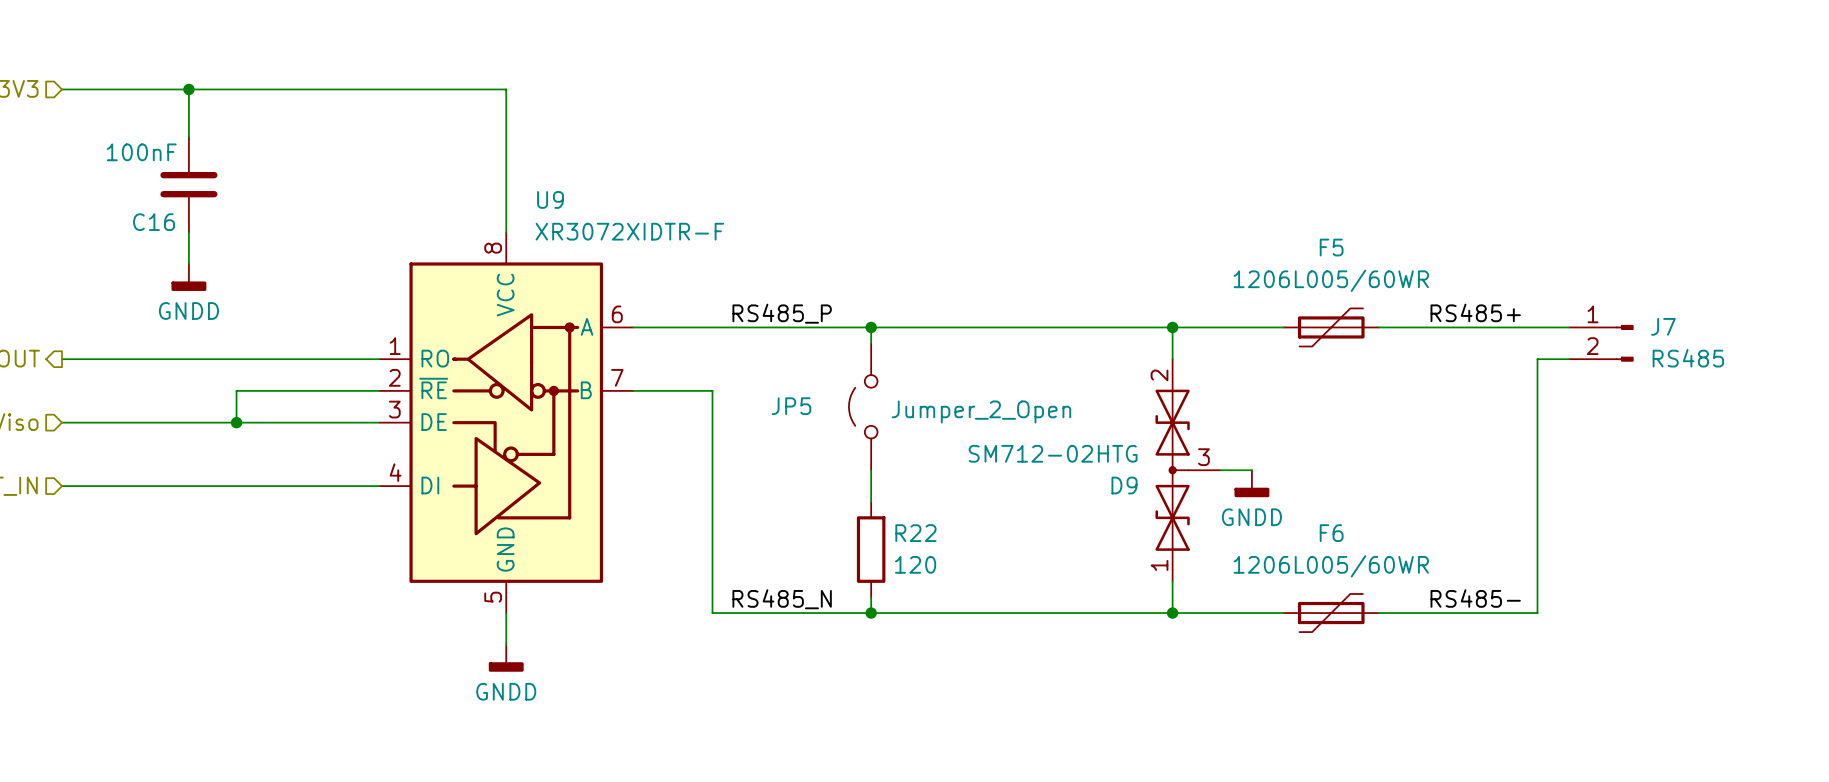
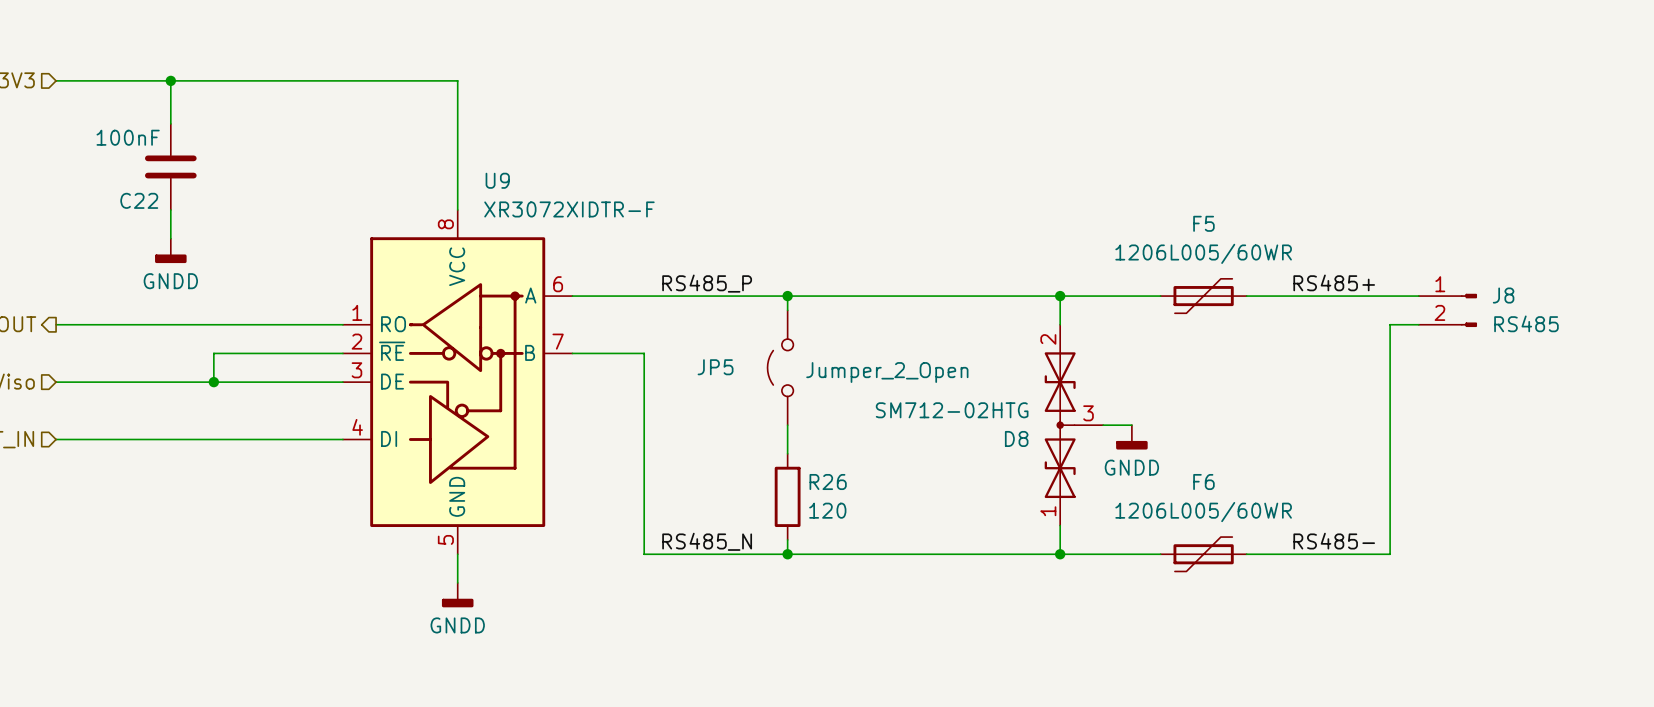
C16 name: C16 (154, 222) -> C22 (139, 200)
J7 name: J7 (1663, 326) -> J8 (1503, 295)
D9 name: D9 (1124, 485) -> D8 (1016, 438)
R22 name: R22 (915, 533) -> R26 (828, 482)

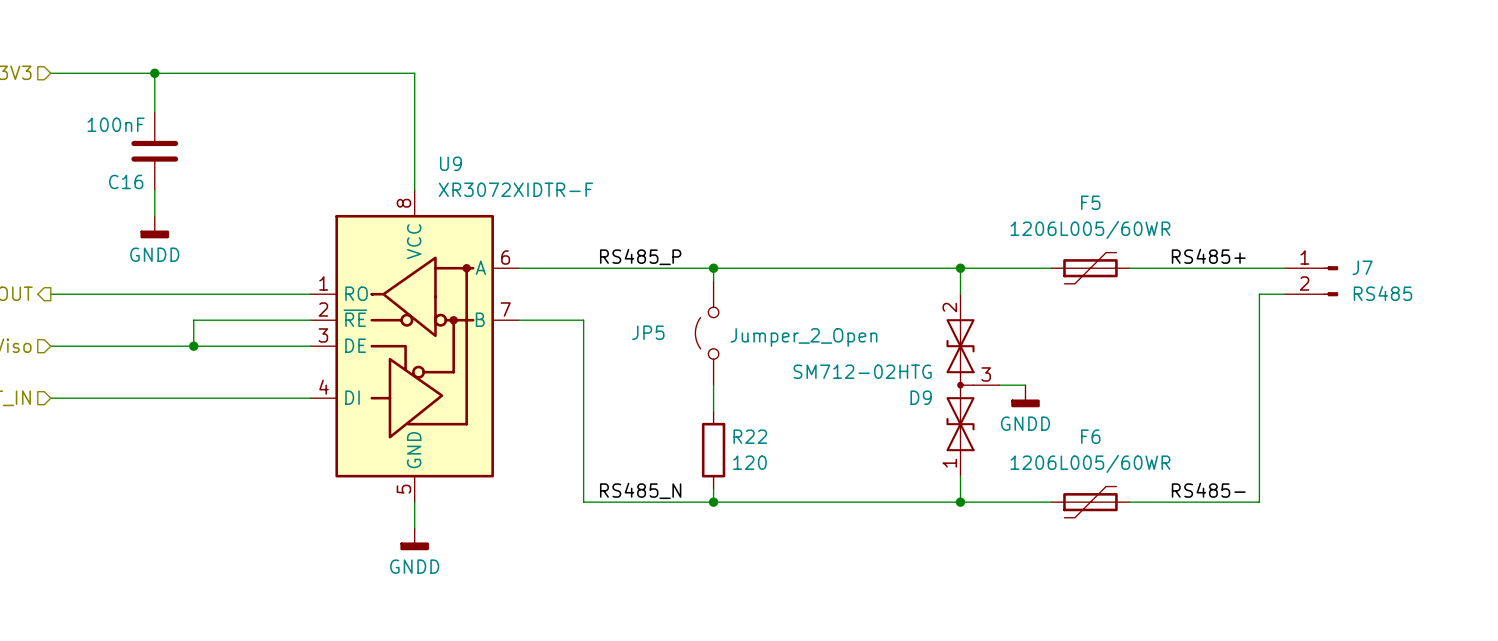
C22 name: C22 (139, 200) -> C16 (126, 181)
J8 name: J8 (1503, 295) -> J7 (1362, 267)
D8 name: D8 (1016, 438) -> D9 (921, 397)
R26 name: R26 (828, 482) -> R22 (750, 436)

